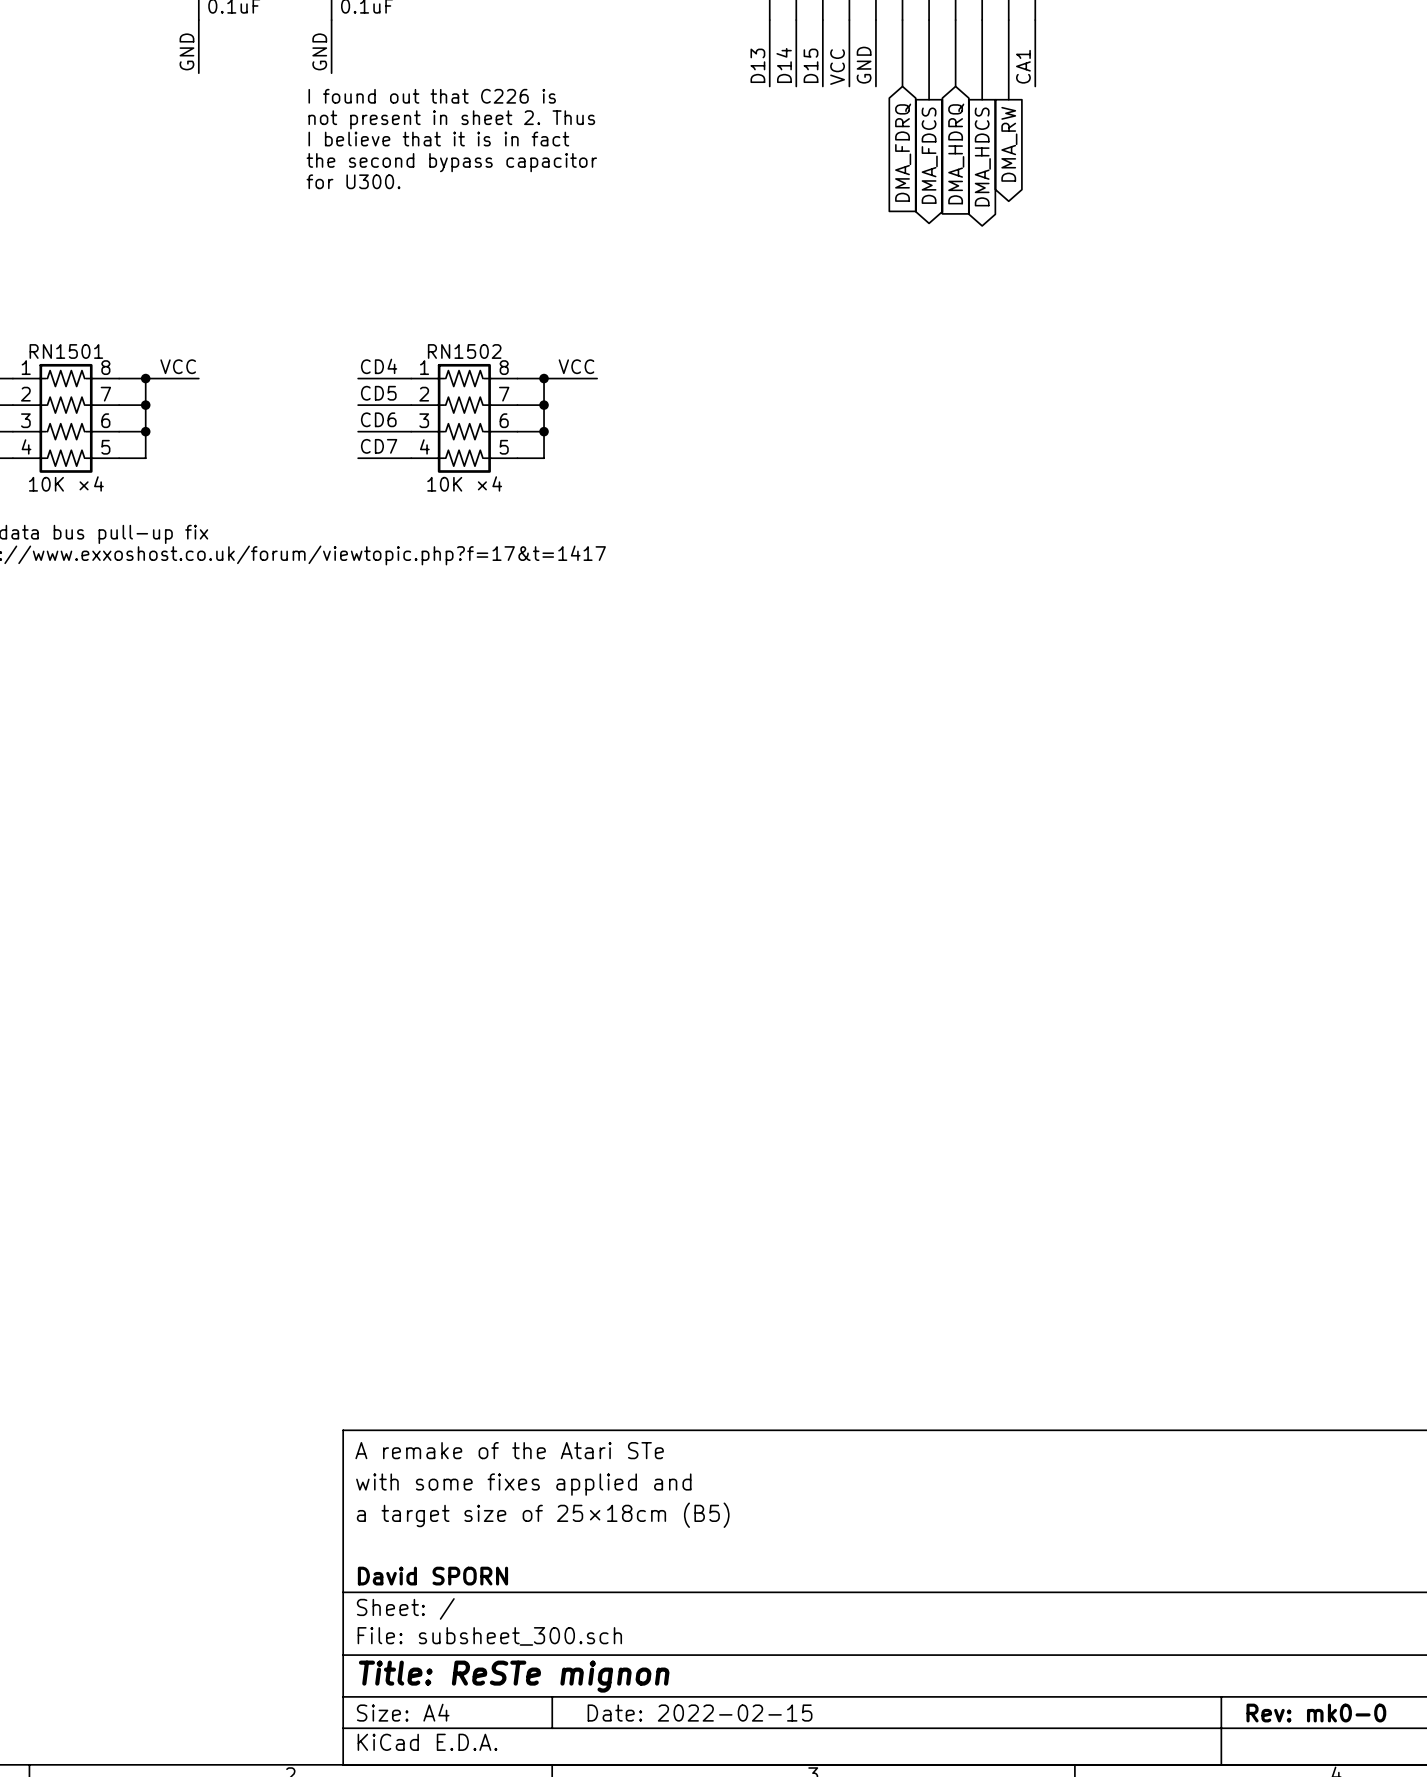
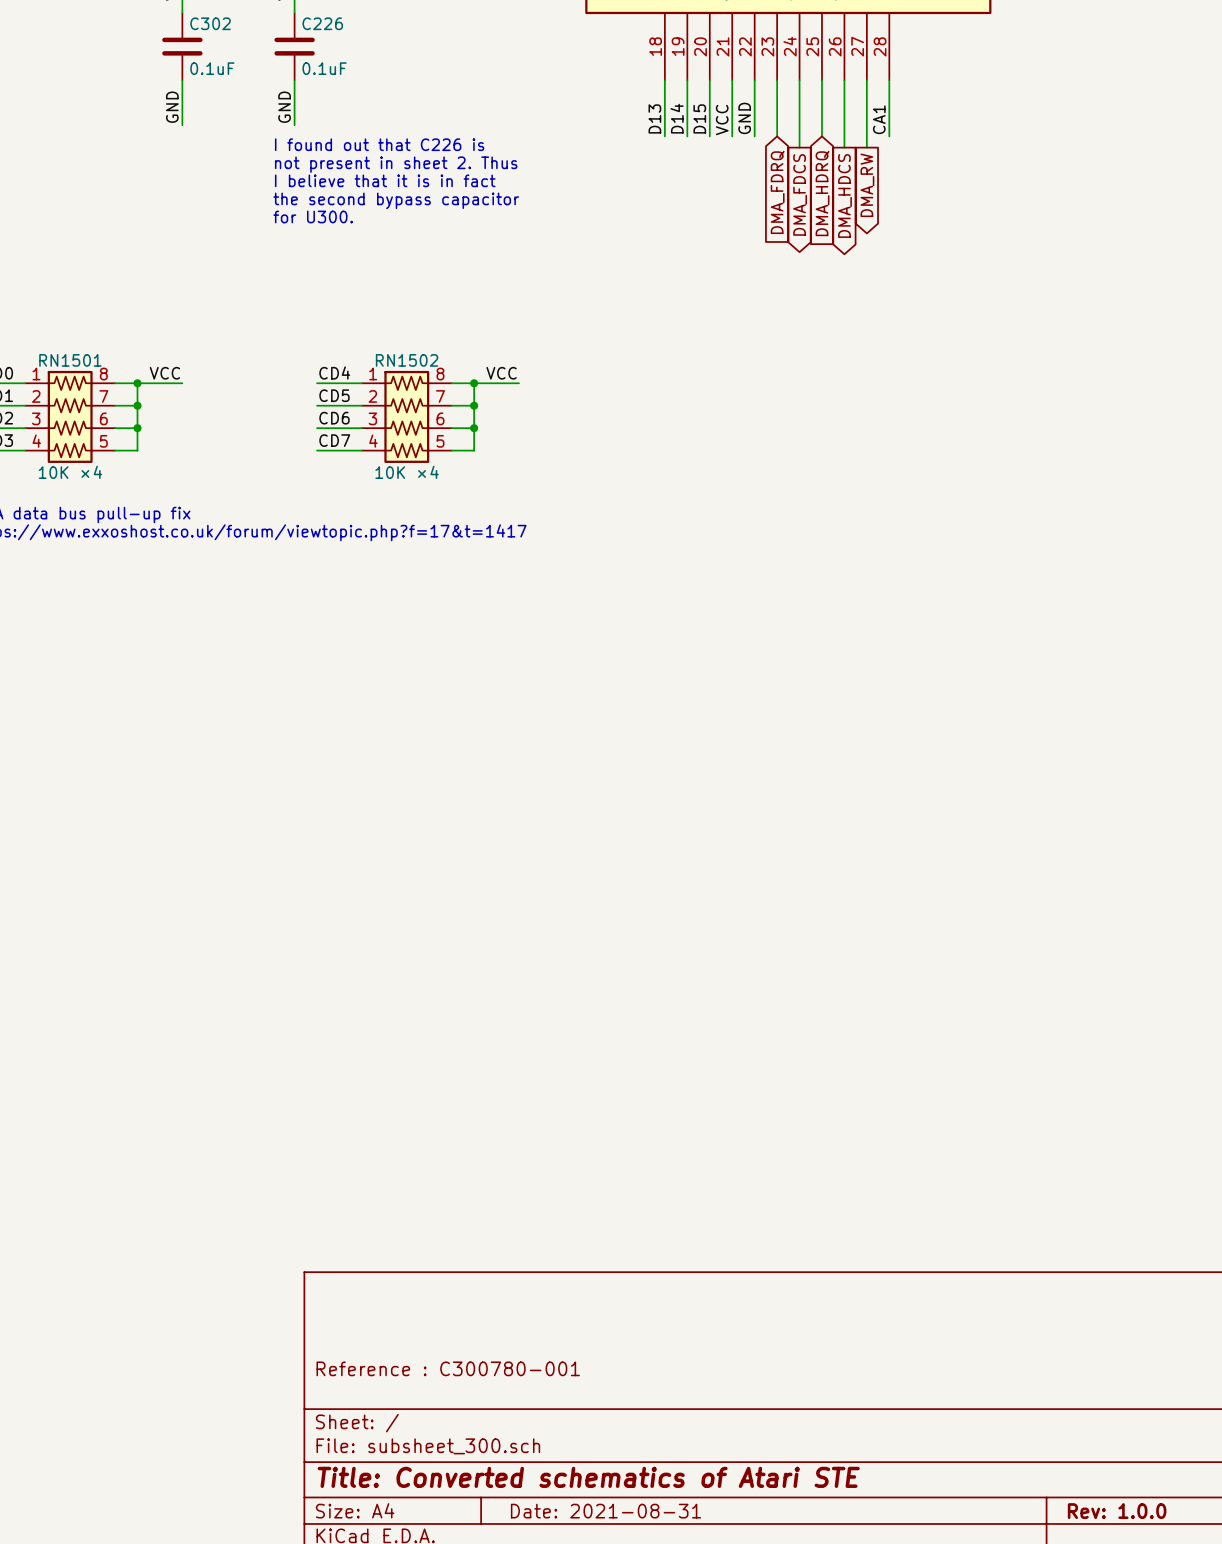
title block: A remake of the Atari STe (509, 1450) -> none
title block: with some fixes applied and (523, 1484) -> none
title block: a target size of 25×18cm (B5) (543, 1515) -> none
title block: none -> Reference : C300780-001 (448, 1368)
title block: David SPORN (432, 1576) -> none
title block: Title: ReSTe mignon (514, 1676) -> Title: Converted schematics of Atari STE (588, 1477)
title block: Date: 2022-02-15 (700, 1713) -> Date: 2021-08-31 (605, 1511)
title block: Rev: mk0-0 (1316, 1713) -> Rev: 1.0.0 (1117, 1511)

